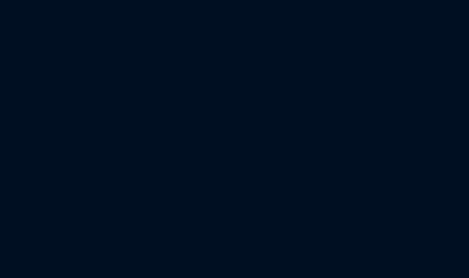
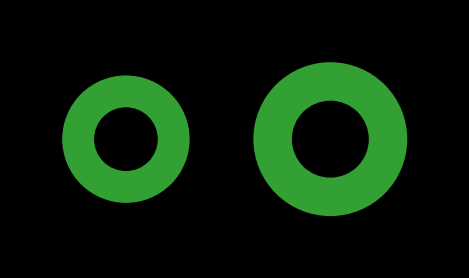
part: none -> (125, 139)
part: none -> (330, 139)

